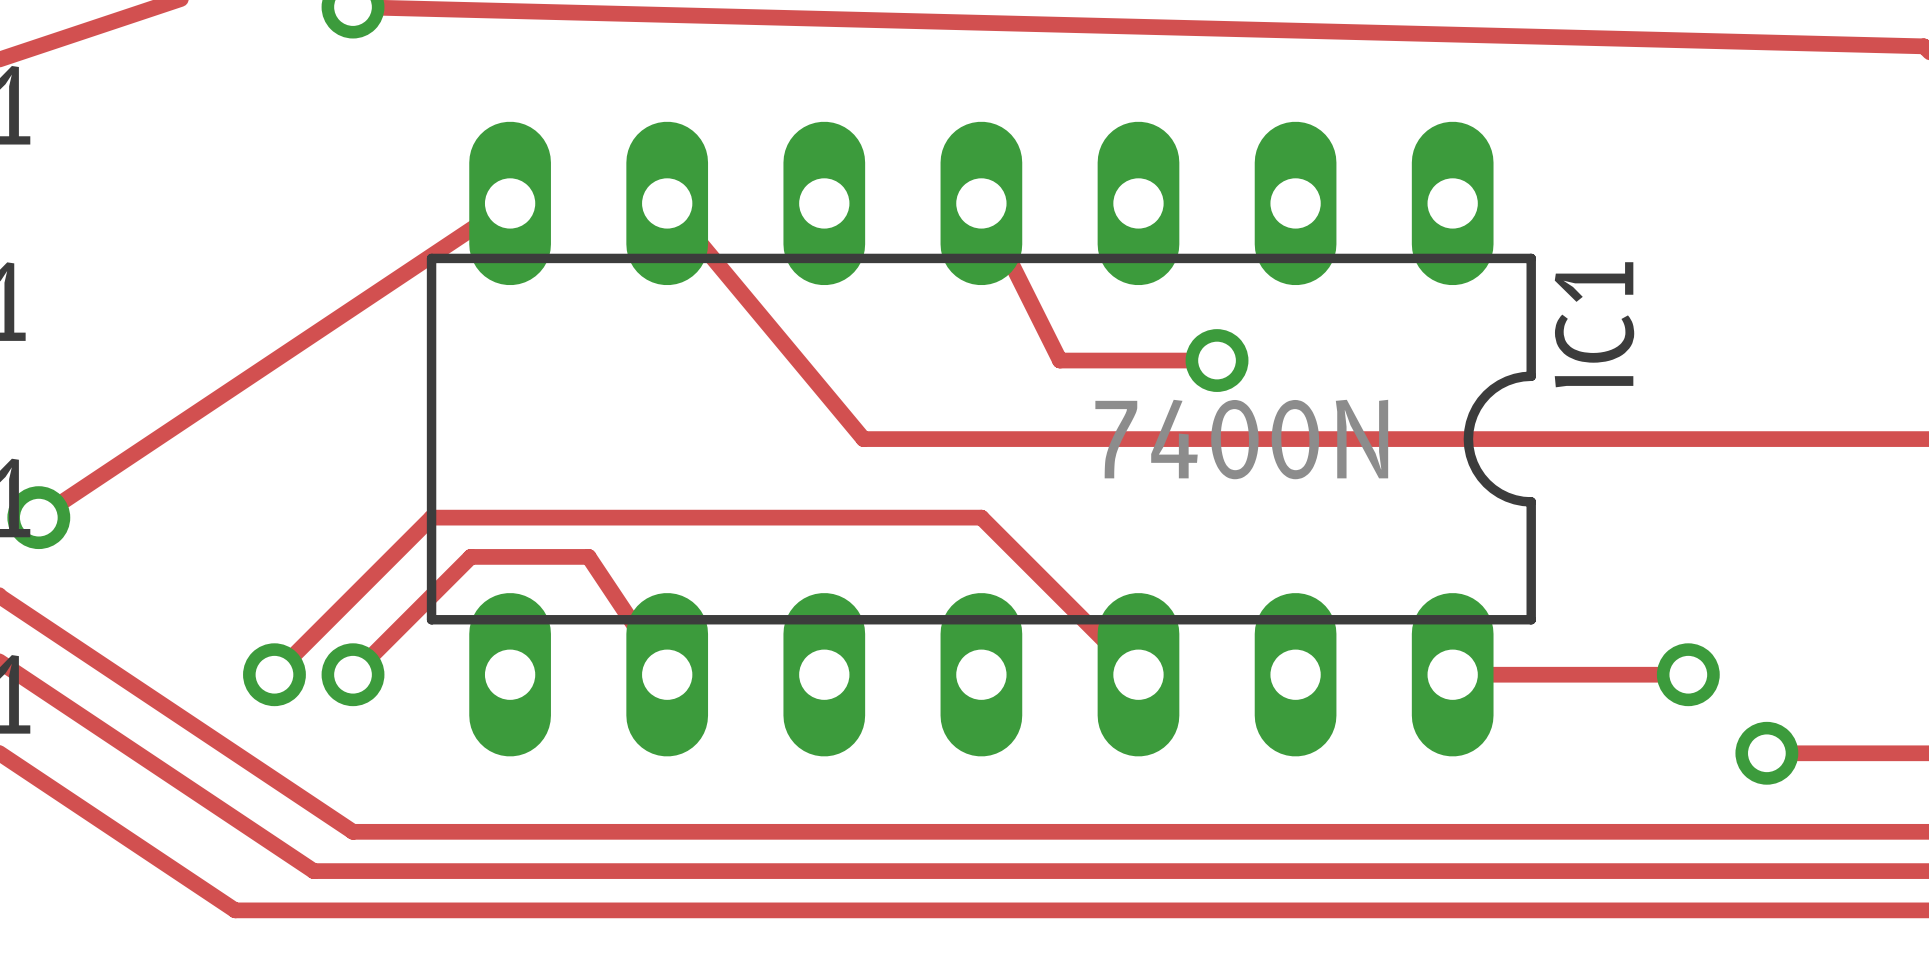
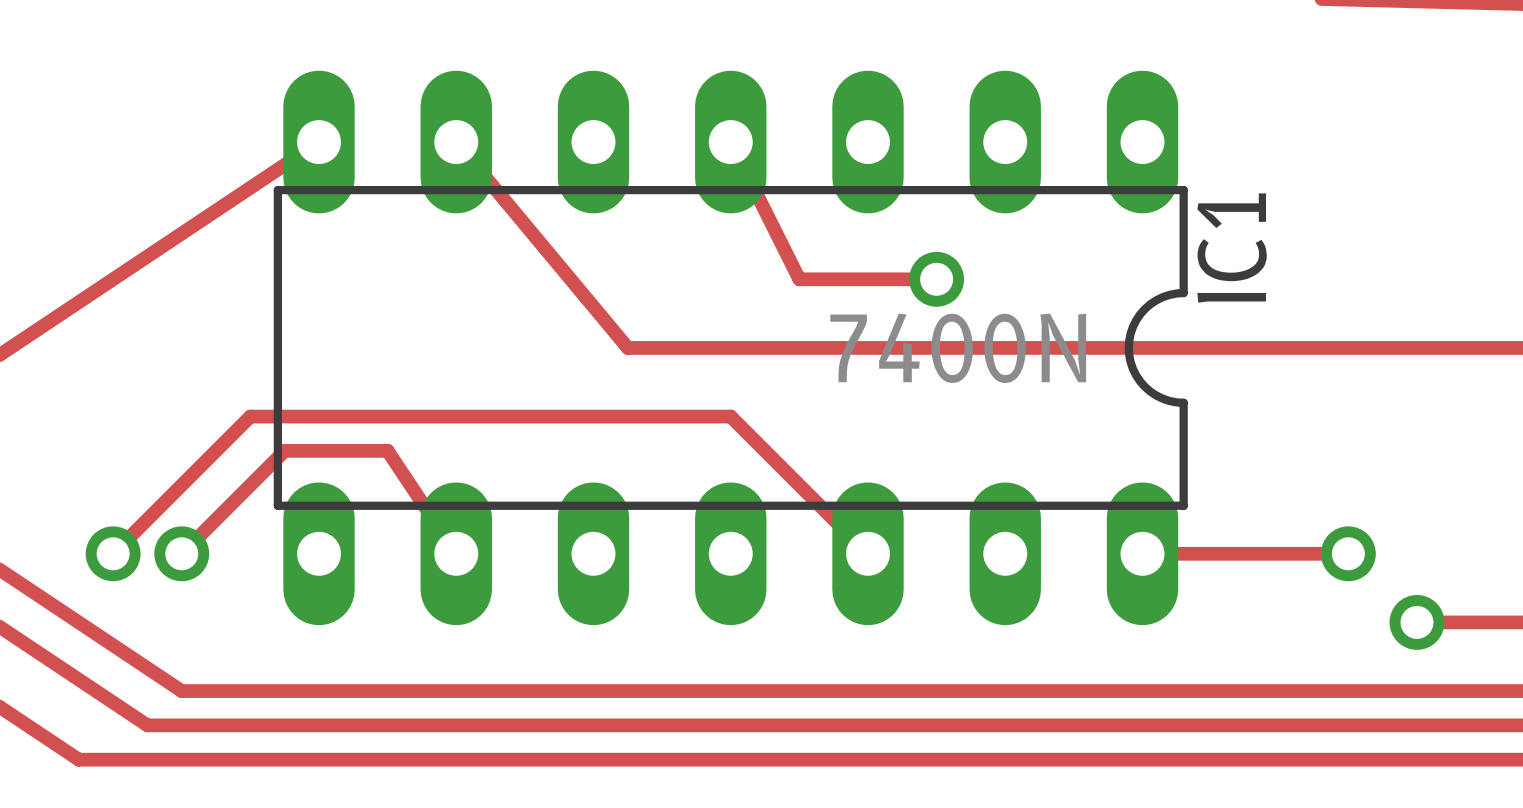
IC1 footprint: [426, 121, 1536, 757] -> [273, 70, 1188, 626]
IC1 name position: IC1 (1594, 324) -> IC1 (1232, 248)

